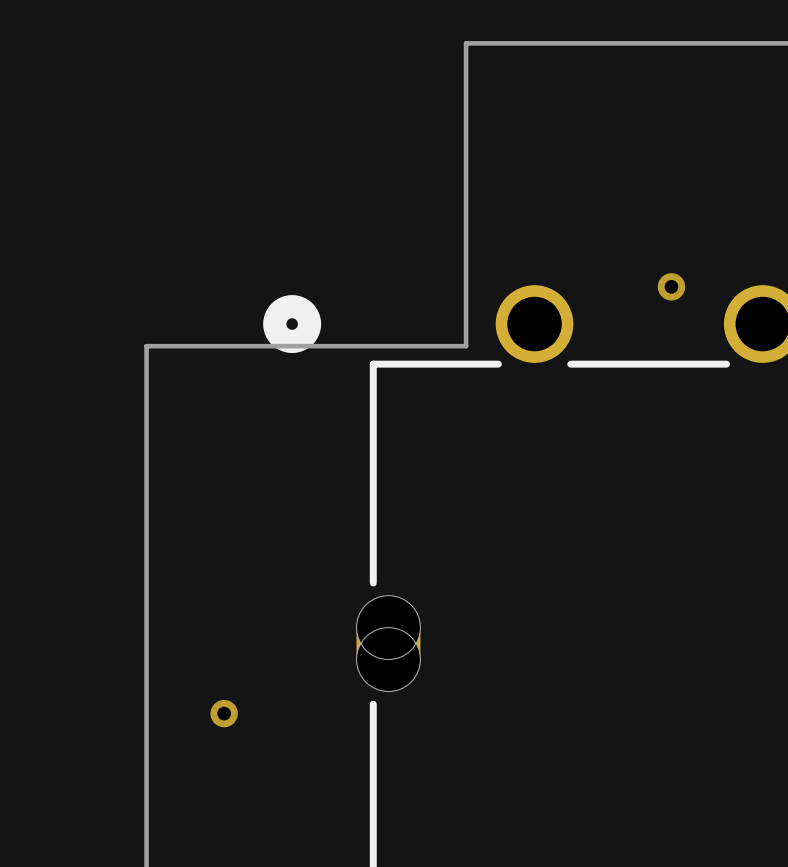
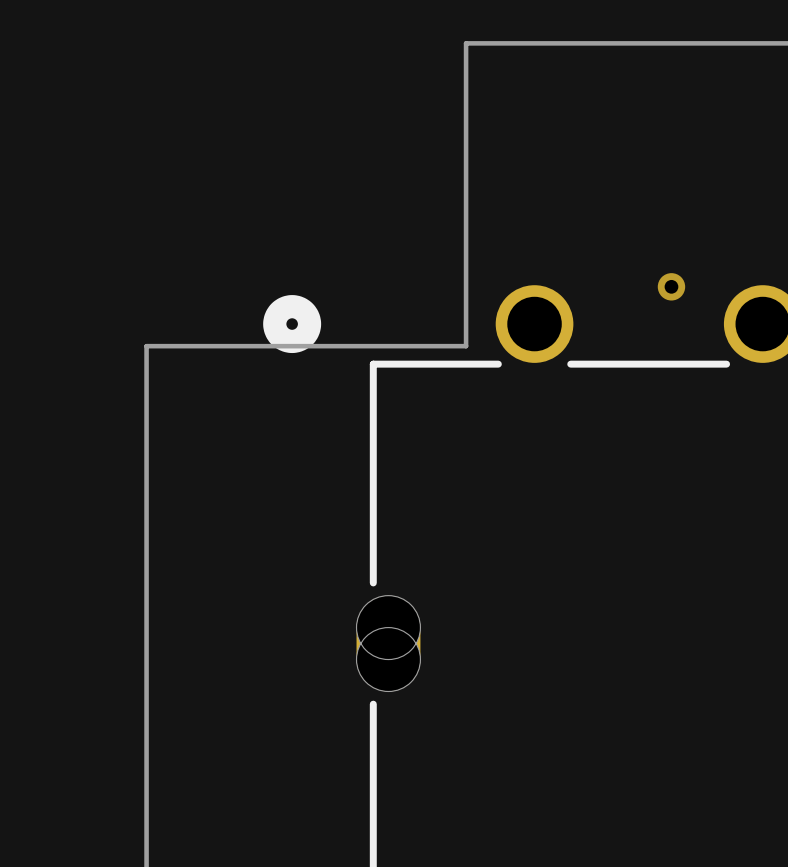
via: (224, 713) -> none

